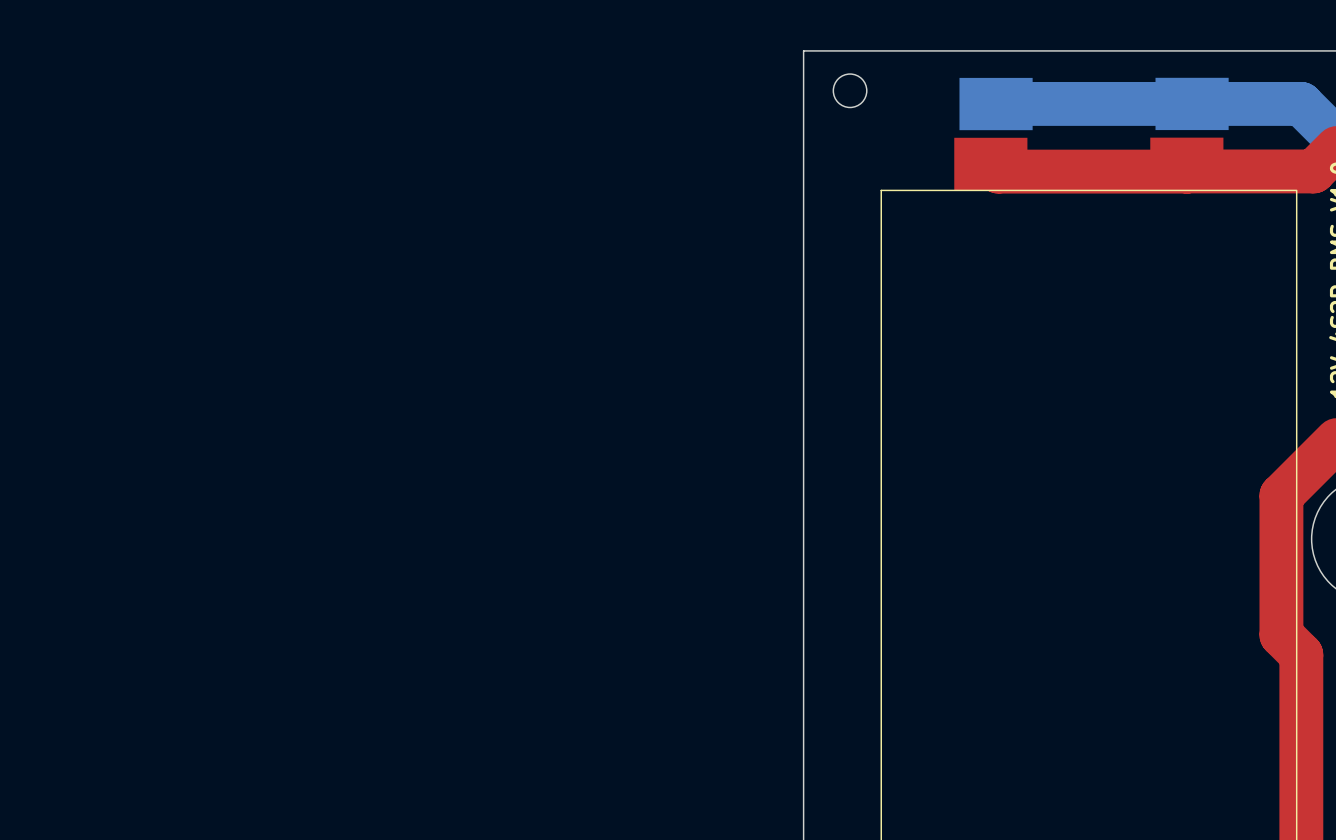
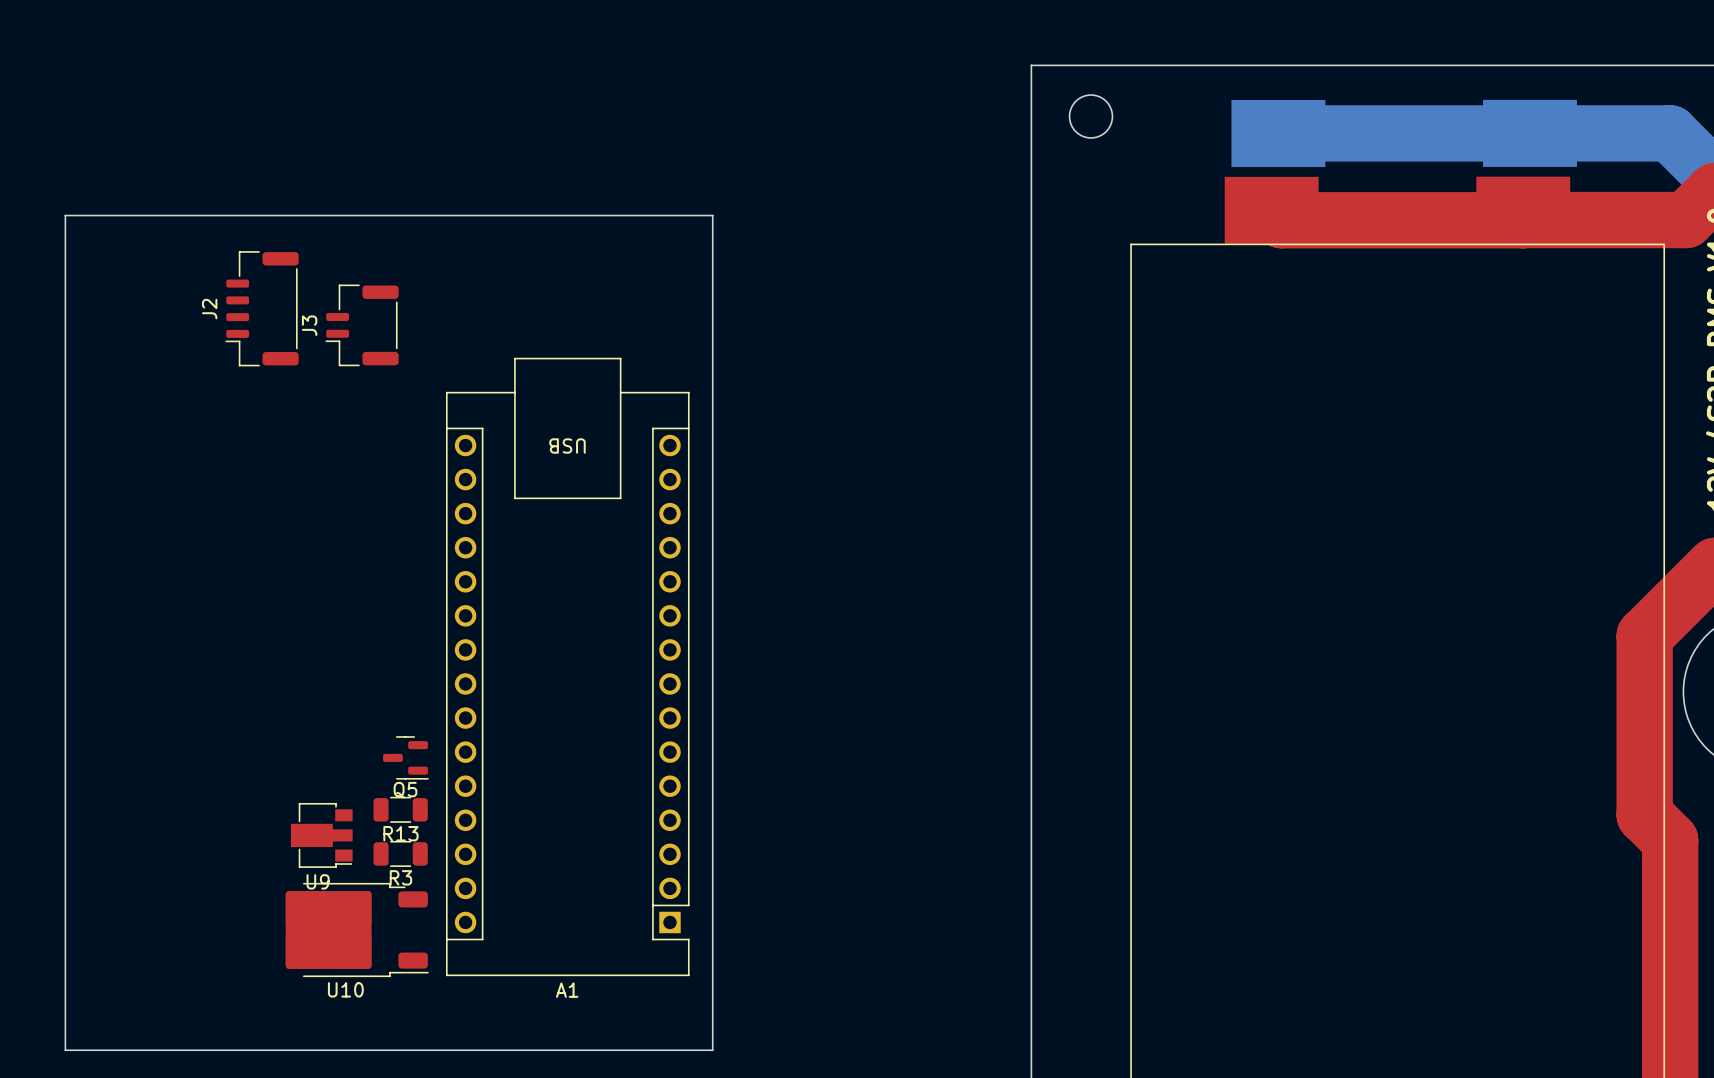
board edge: none -> (65, 215) (712, 215) (712, 1050) (65, 1050) (65, 215)
J2: none -> (262, 308)
J3: none -> (362, 325)
A1: none -> (567, 666)
Q5: none -> (405, 757)
R13: none -> (400, 809)
U9: none -> (321, 835)
R3: none -> (400, 853)
U10: none -> (357, 929)

